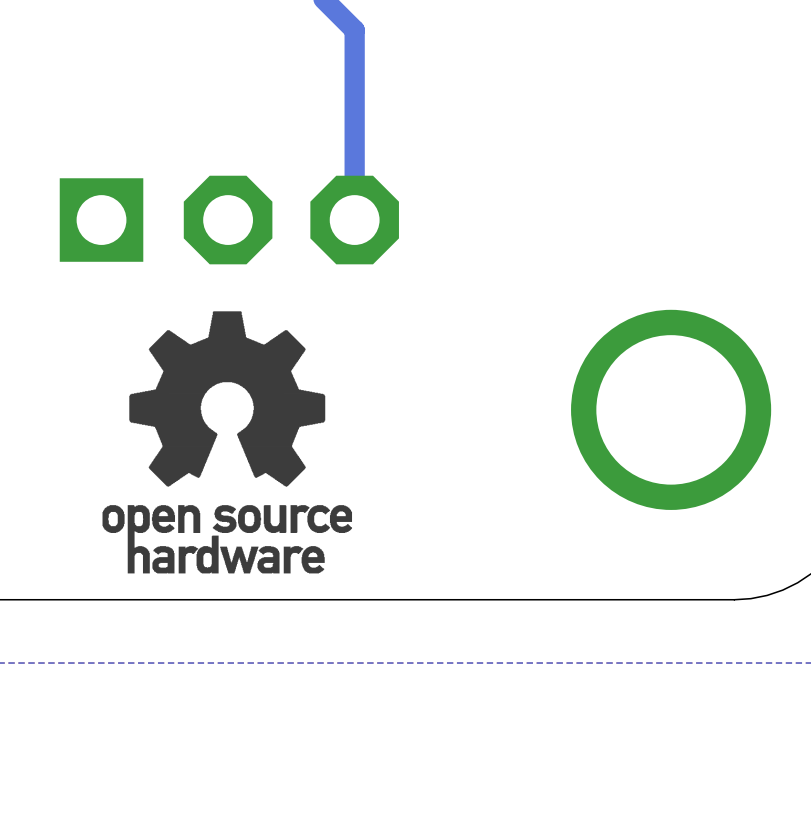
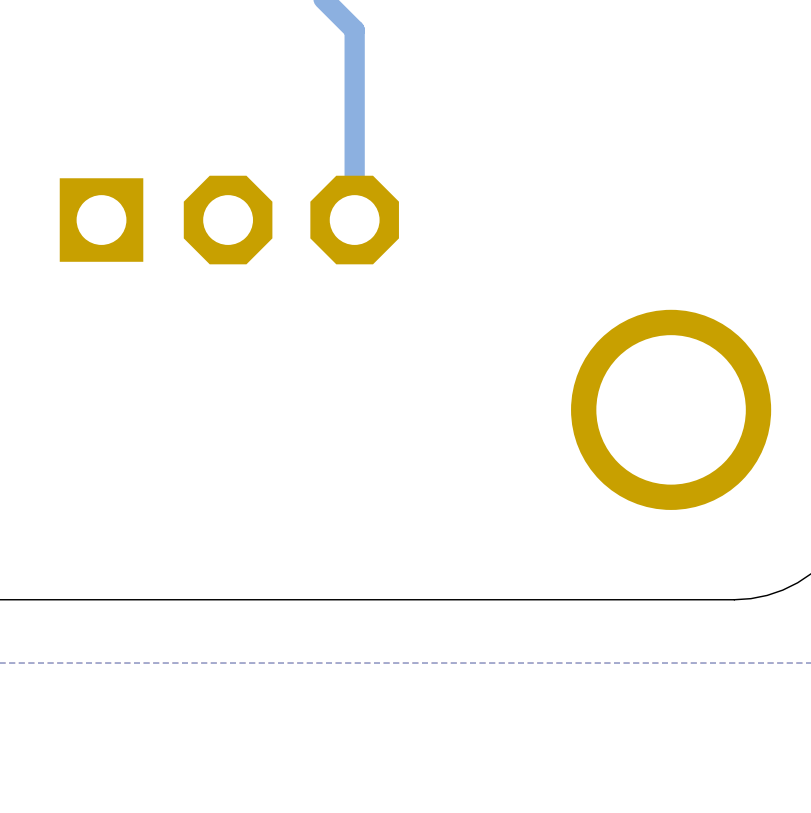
drawing: [102, 311, 353, 574] -> none

